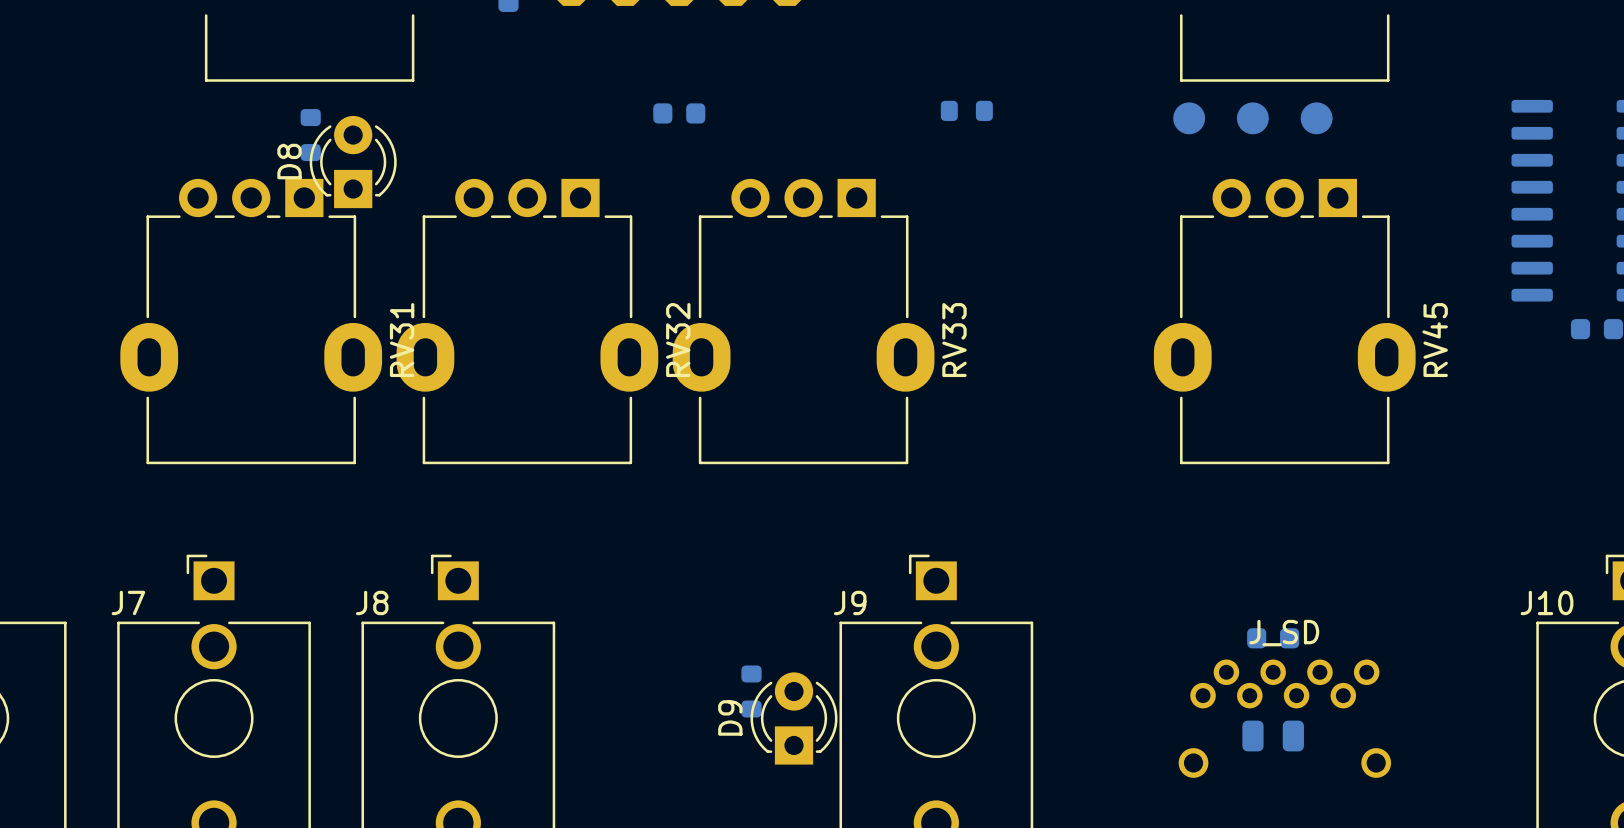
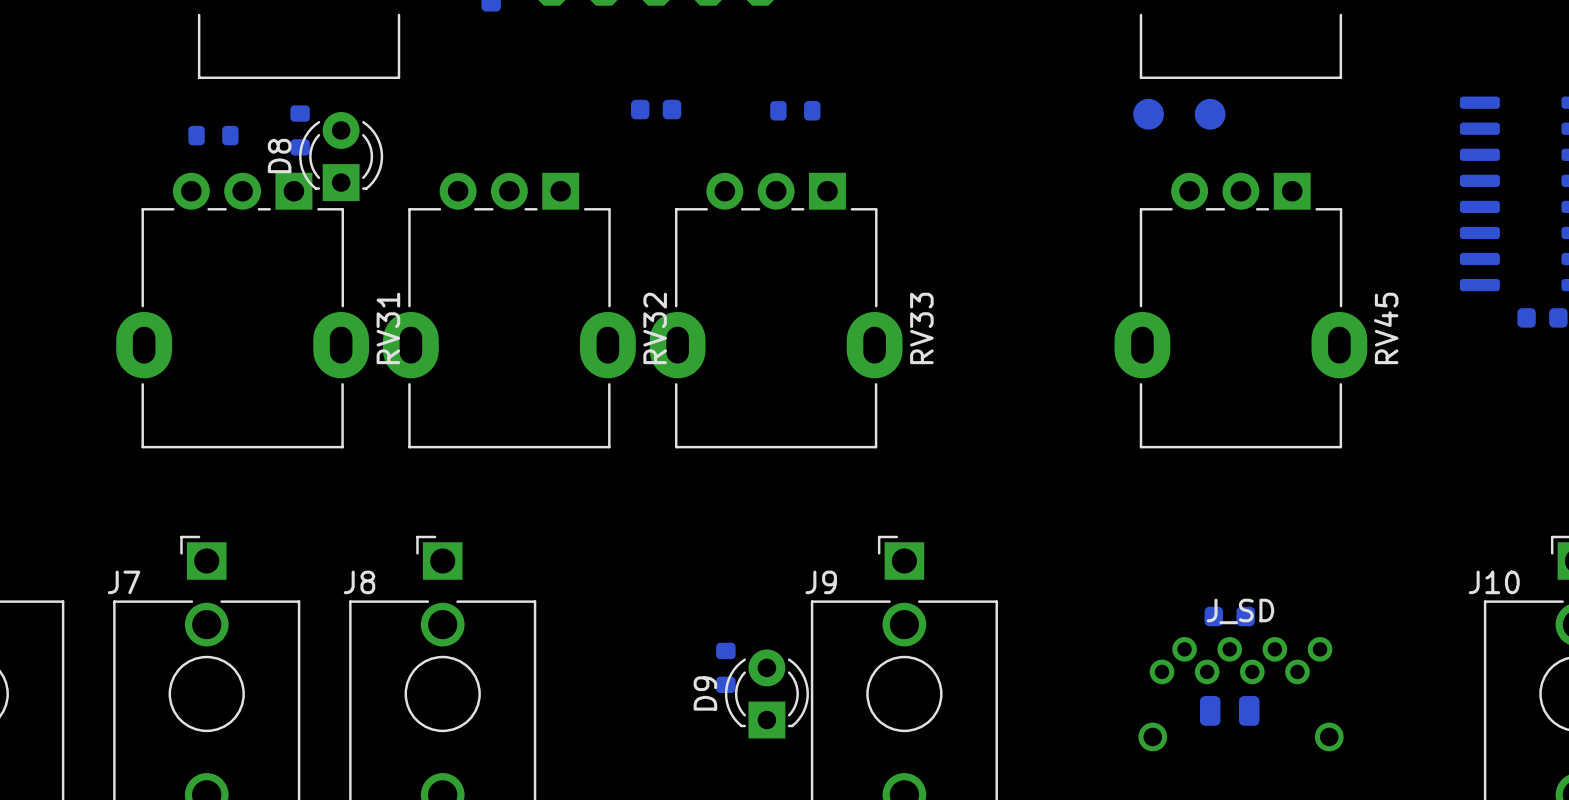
part position: (966, 110) -> (795, 110)
part: (1316, 118) -> none
part: none -> (213, 135)

